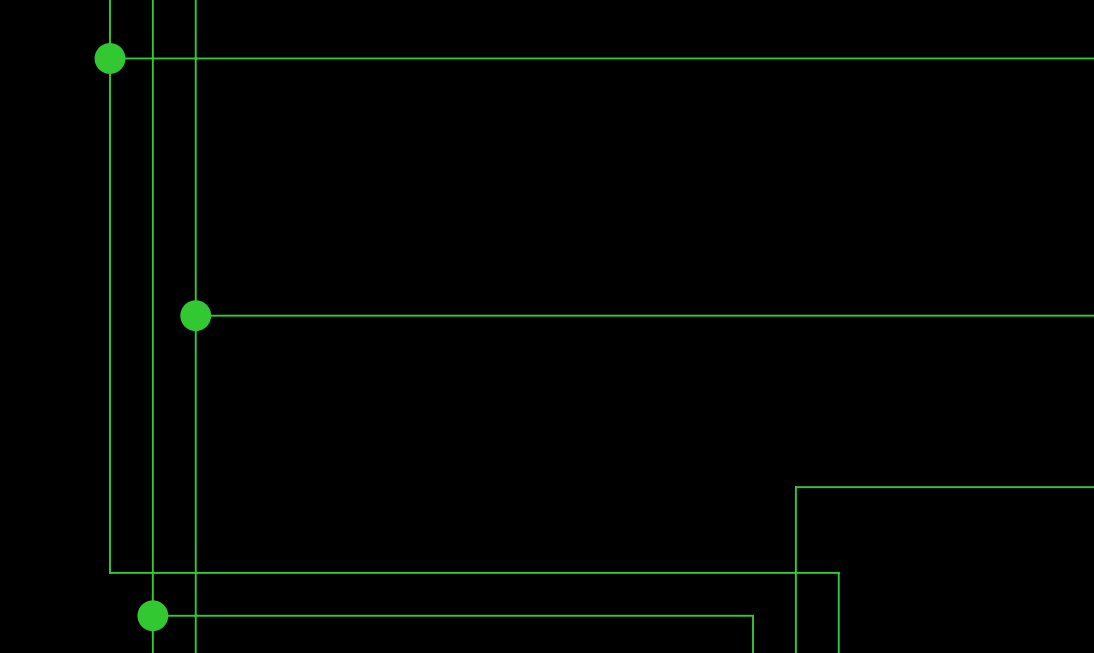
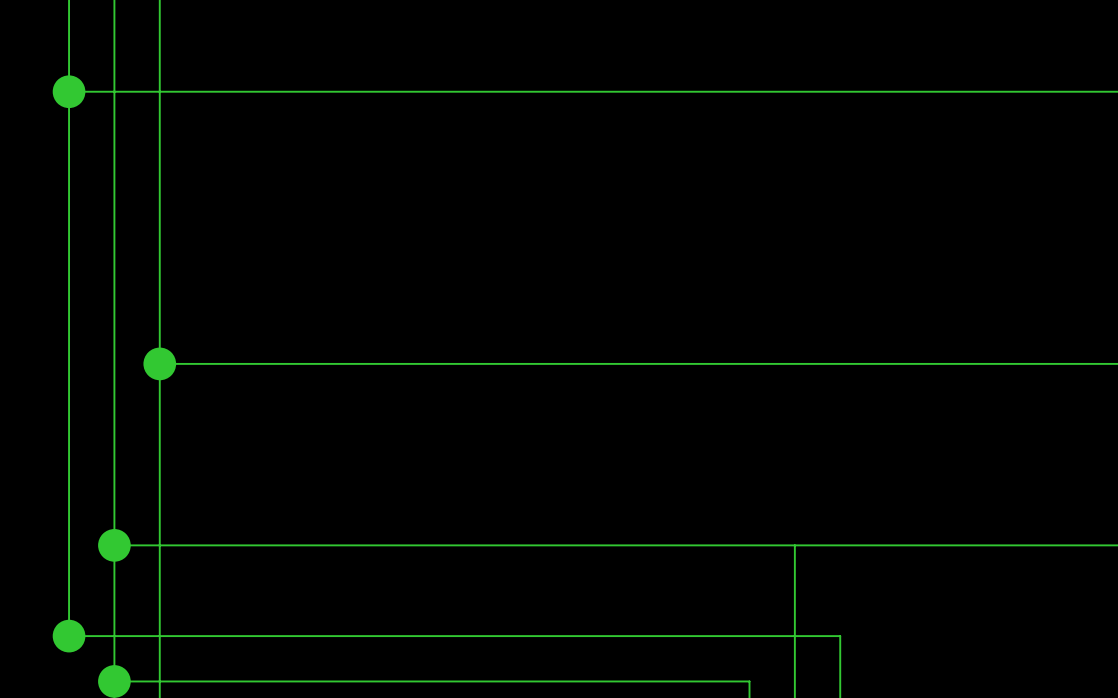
wire: none -> (114, 545) (794, 545)
junction: none -> (114, 545)
junction: none -> (69, 636)

